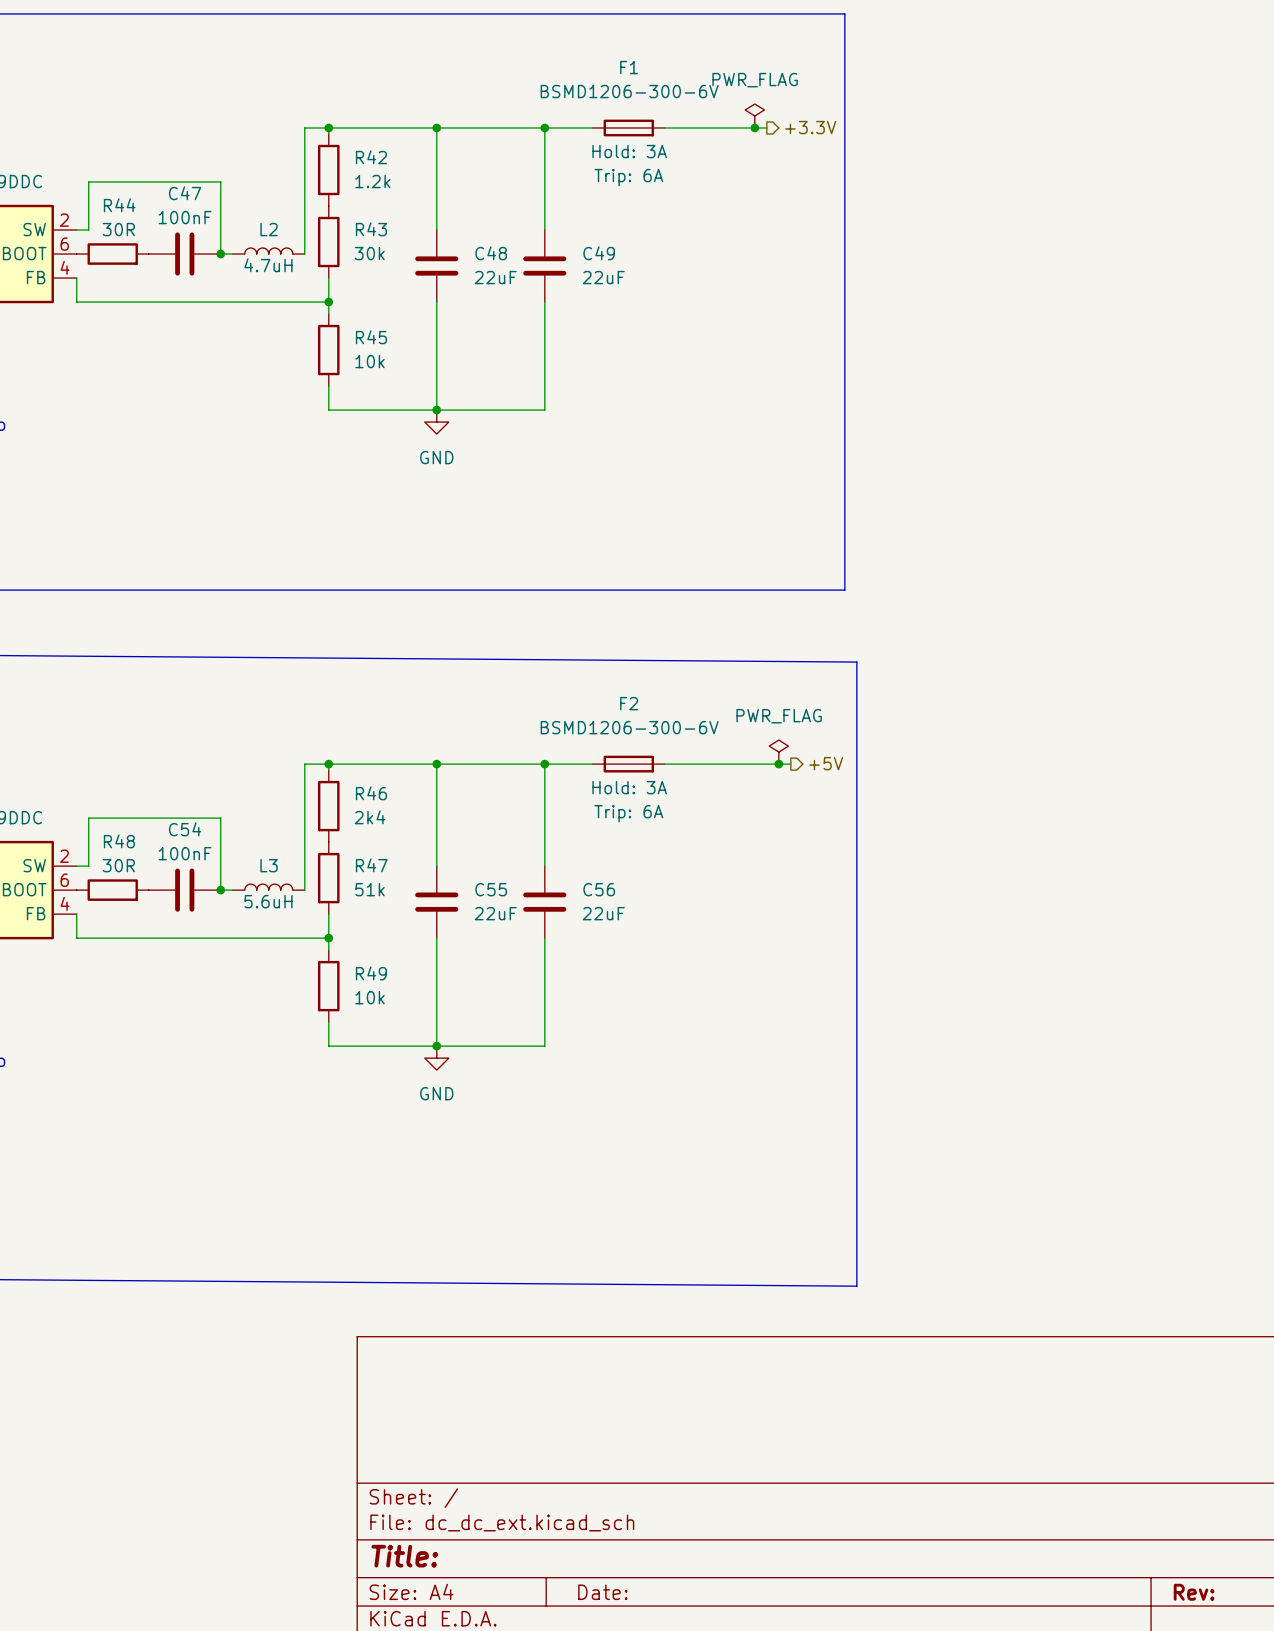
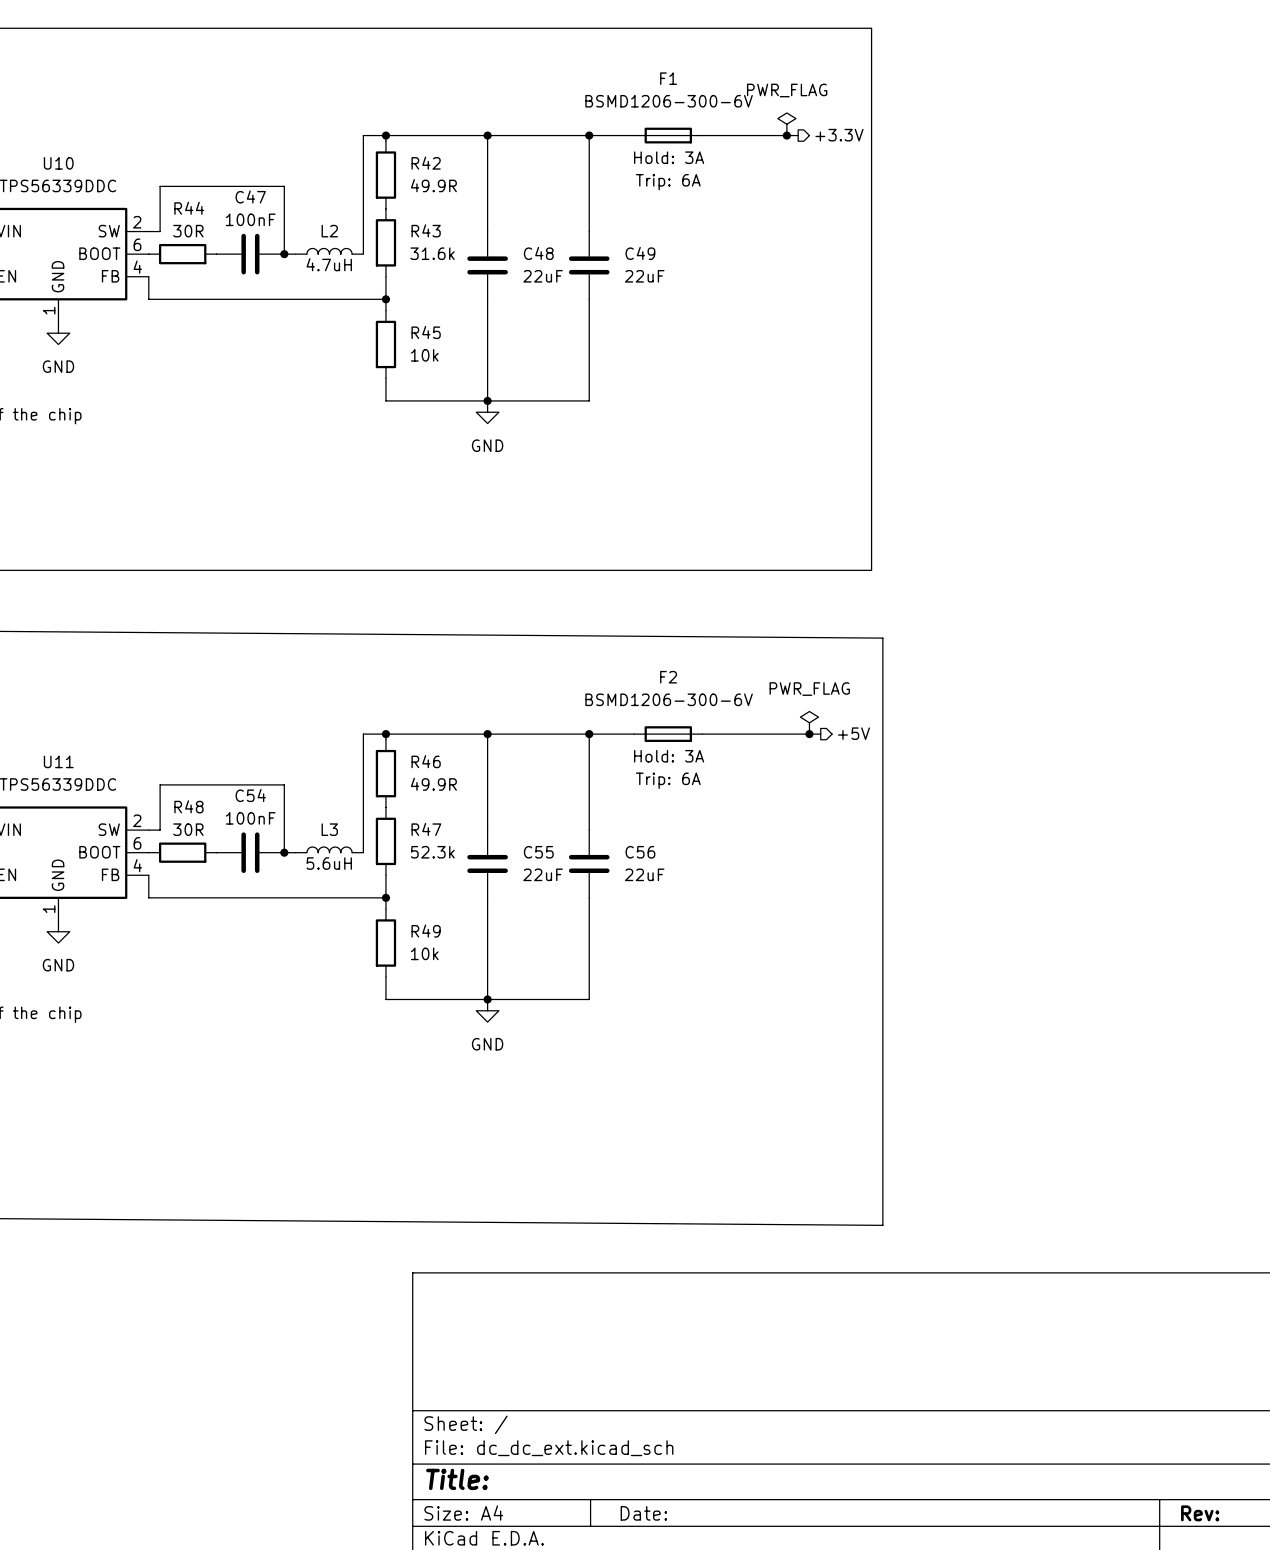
R42 value: 1.2k (372, 181) -> 49.9R (433, 185)
R43 value: 30k (369, 253) -> 31.6k (432, 253)
R46 value: 2k4 (370, 817) -> 49.9R (433, 784)
R47 value: 51k (370, 889) -> 52.3k (432, 852)

